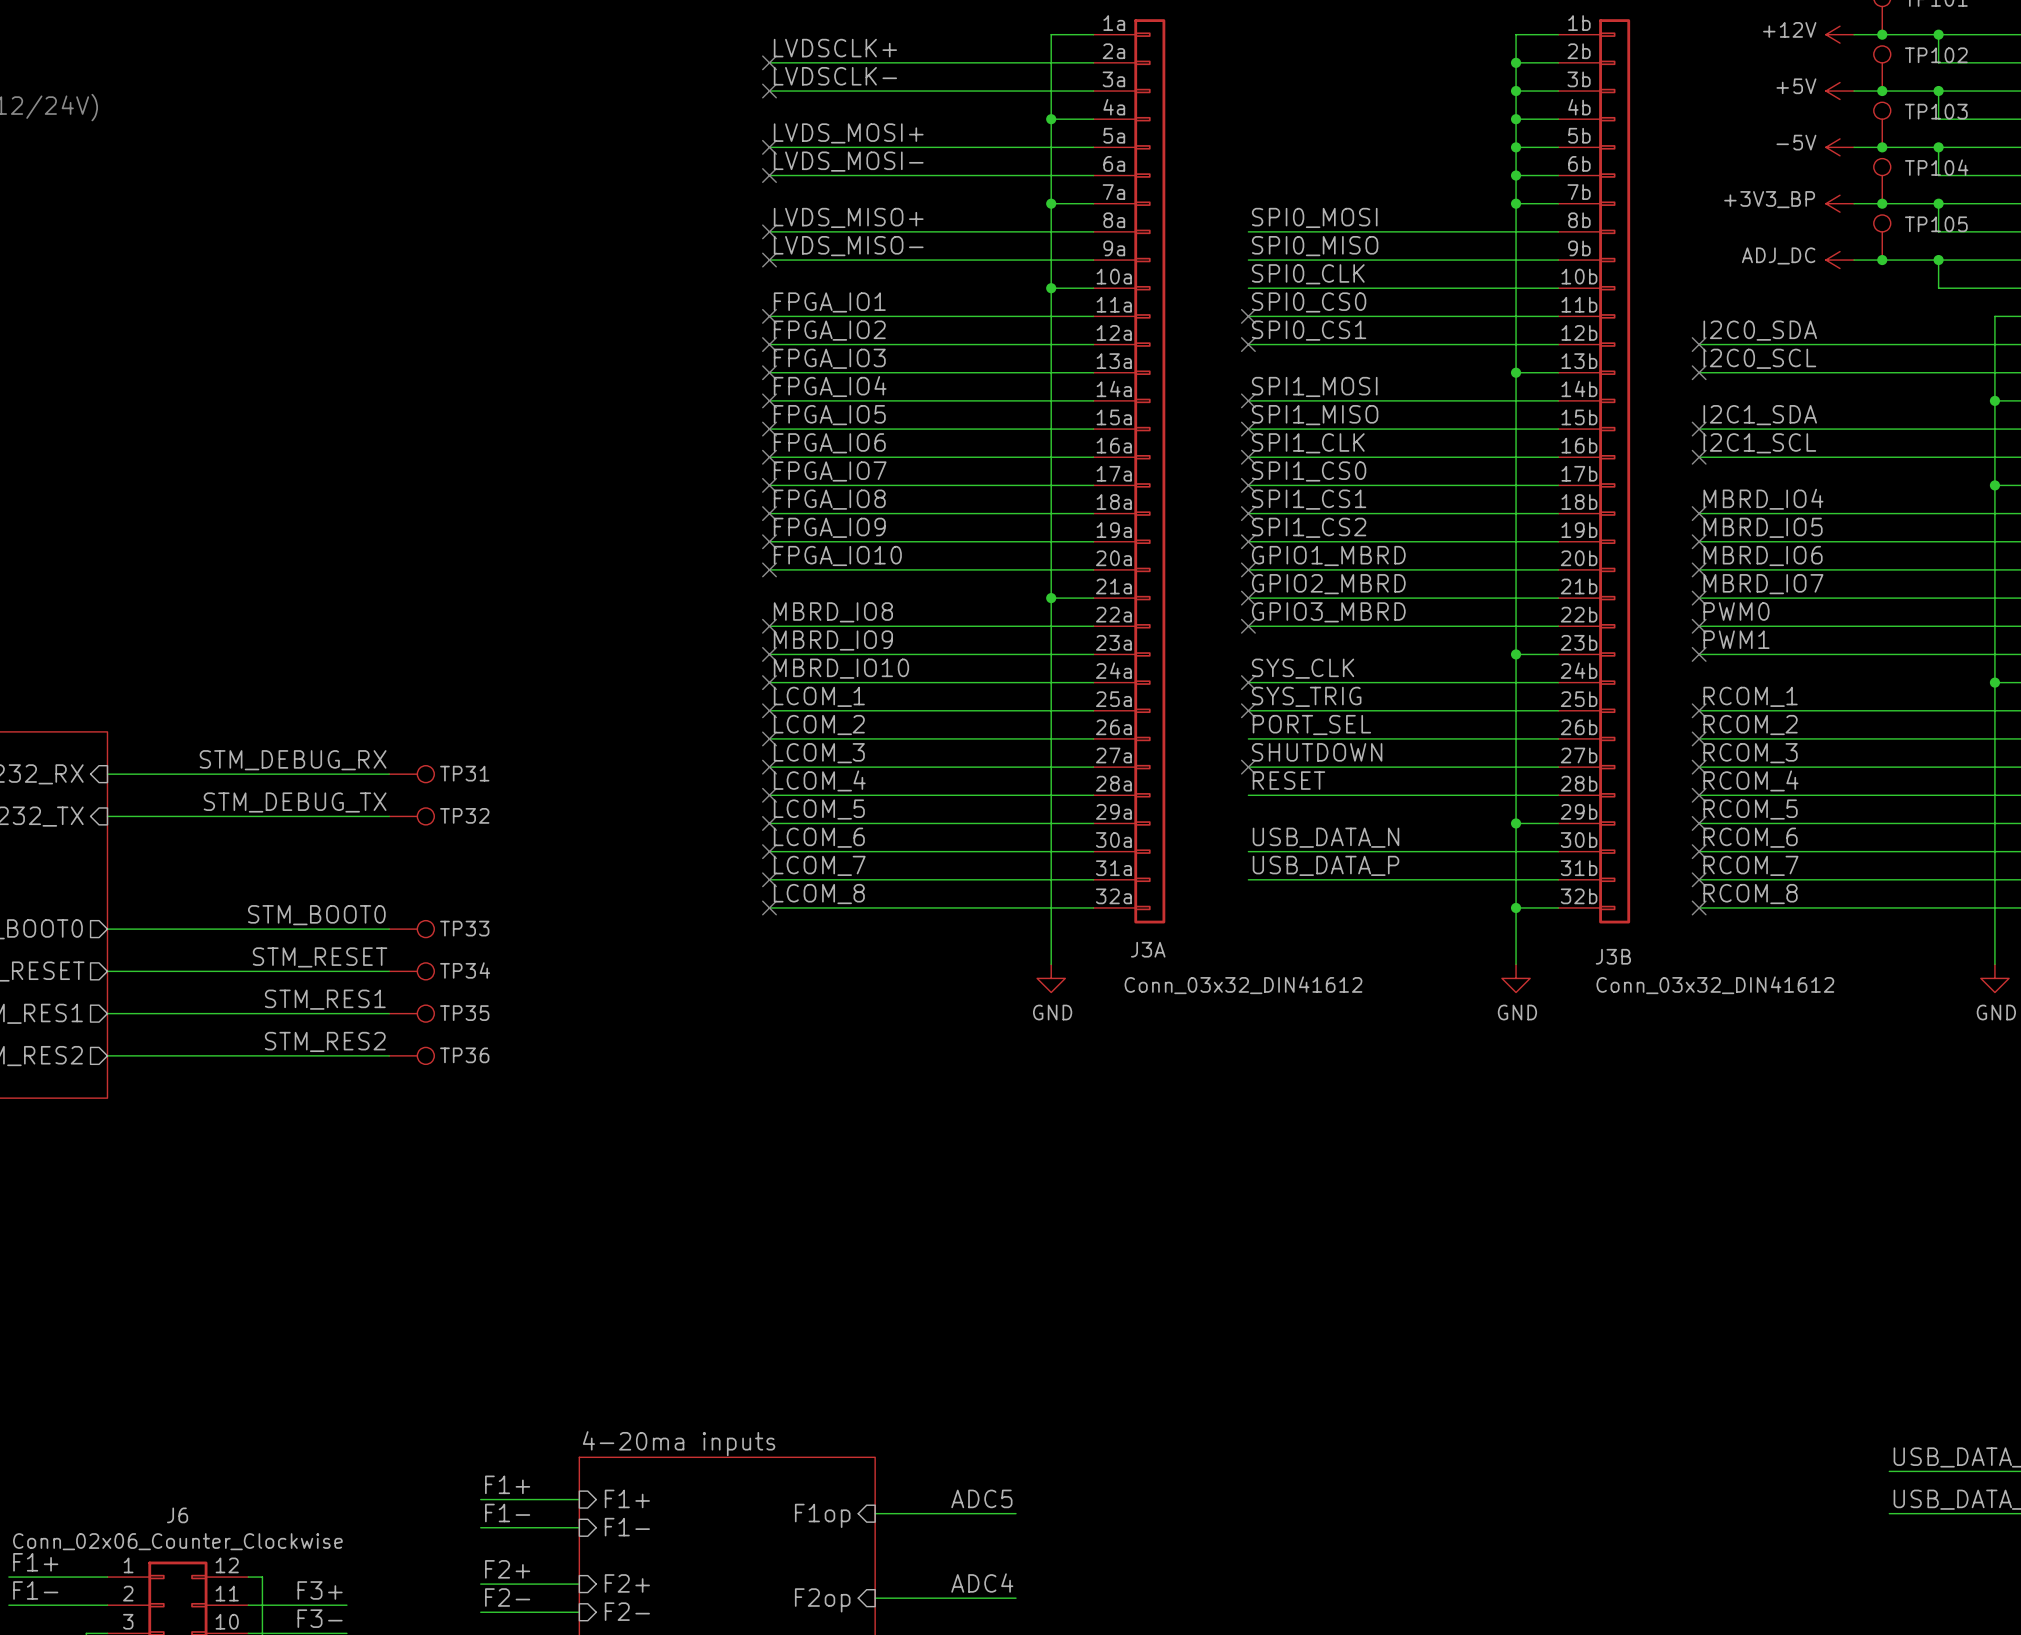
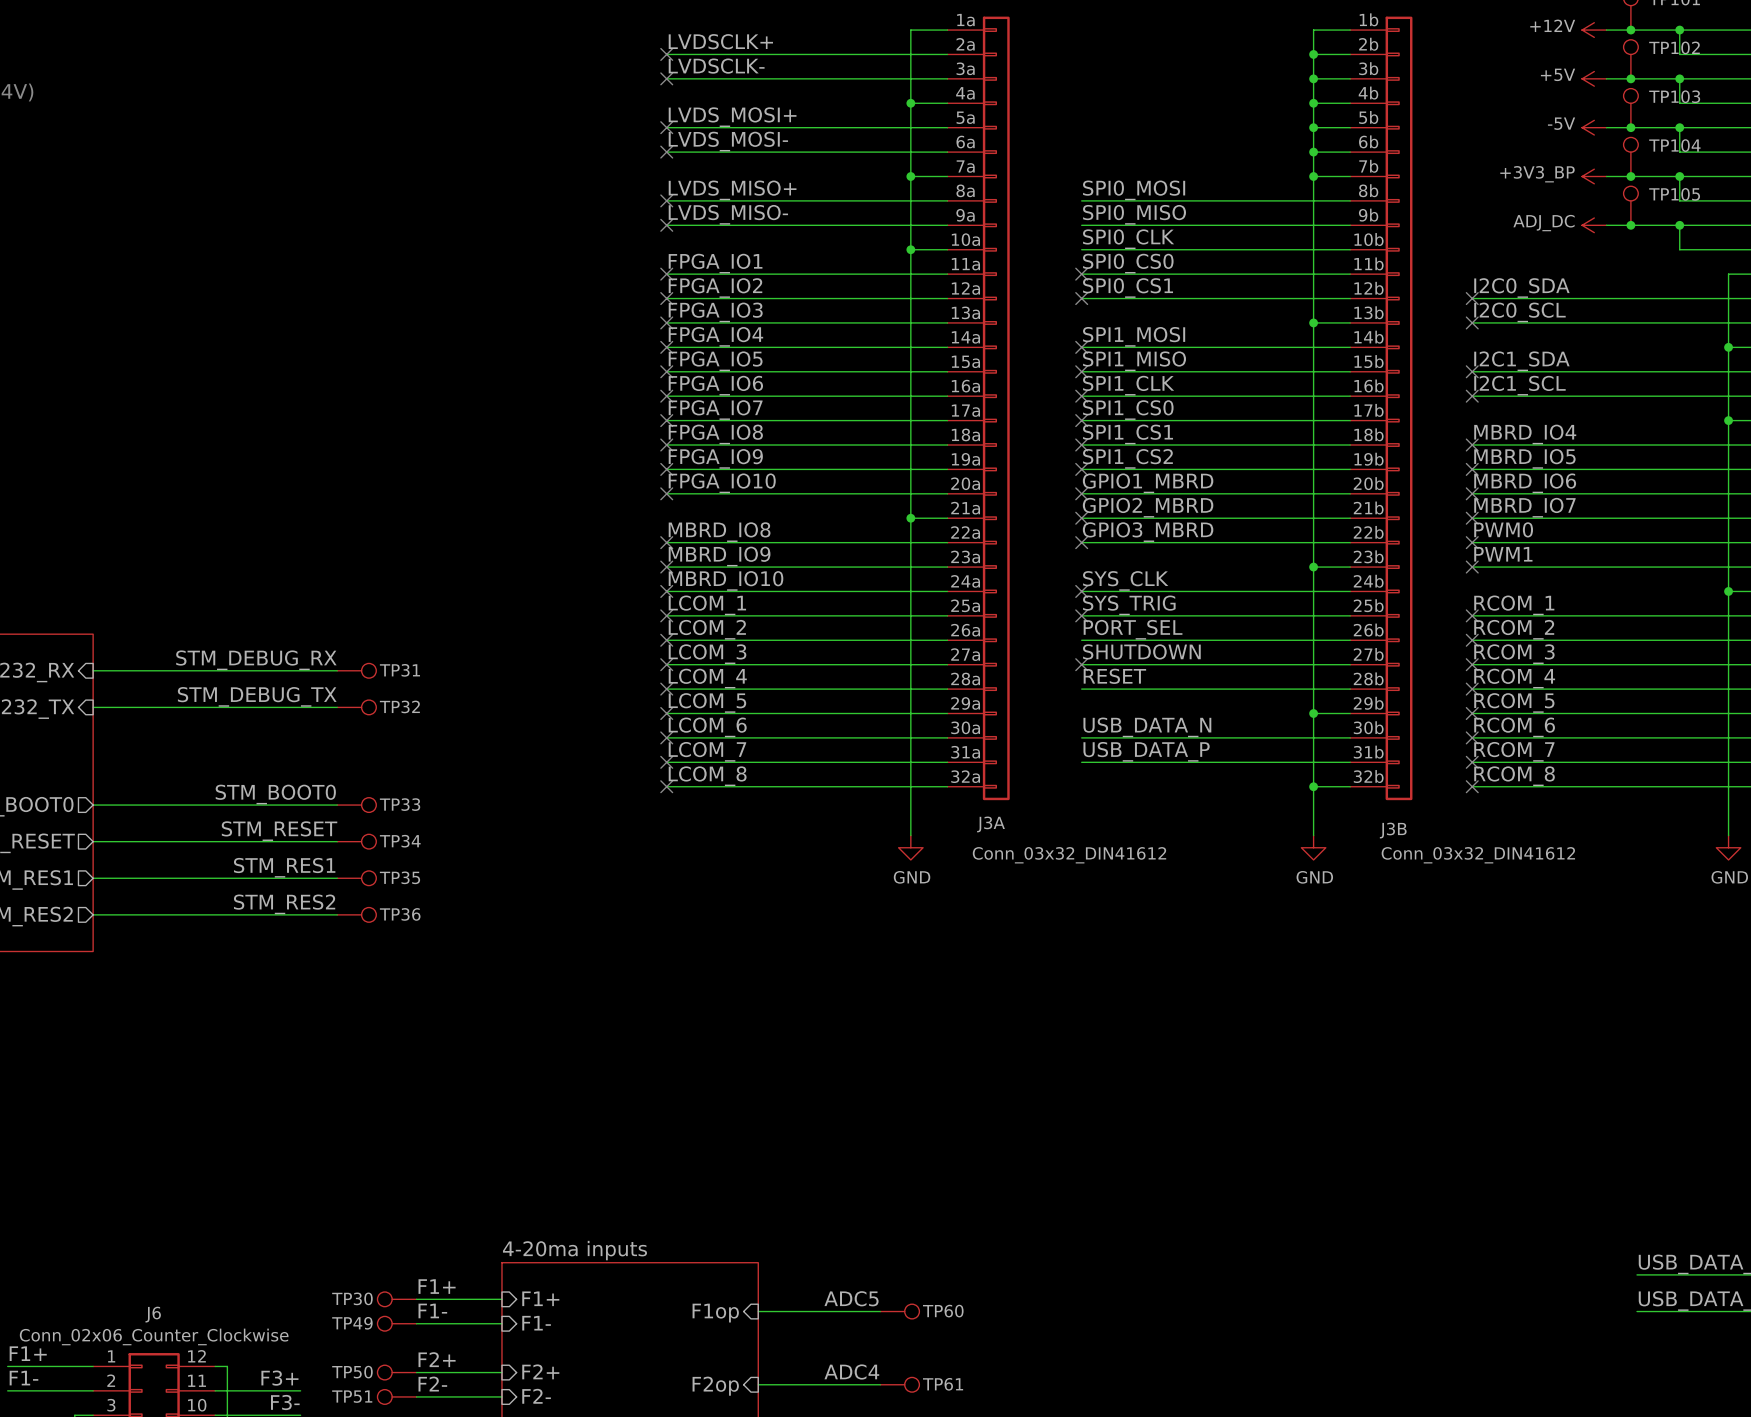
TP30: none -> (397, 1299)
TP60: none -> (899, 1311)
TP49: none -> (397, 1323)
TP50: none -> (397, 1372)
TP61: none -> (899, 1384)
TP51: none -> (397, 1396)

